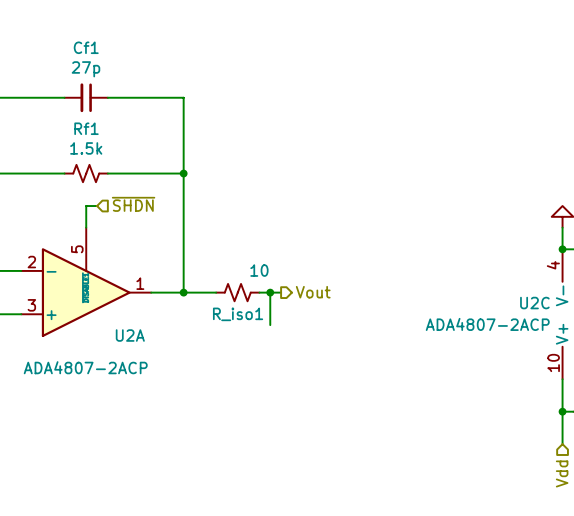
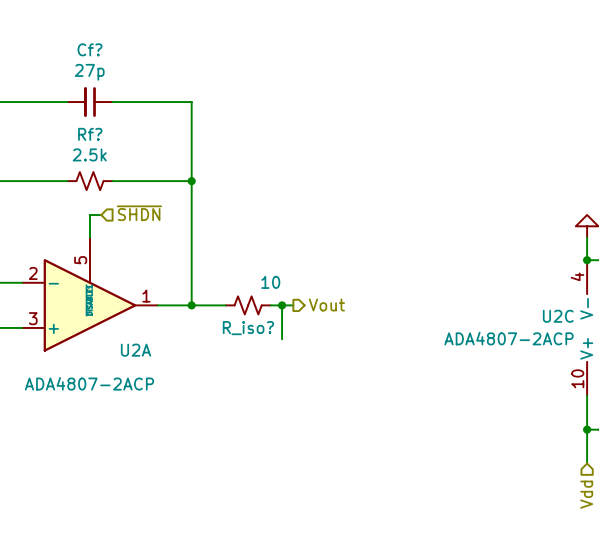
Cf1 name: Cf1 (86, 47) -> Cf? (89, 49)
Rf1 name: Rf1 (86, 128) -> Rf? (90, 134)
Rf1 value: 1.5k (86, 148) -> 2.5k (89, 154)
R_iso1 name: R_iso1 (238, 314) -> R_iso? (248, 328)

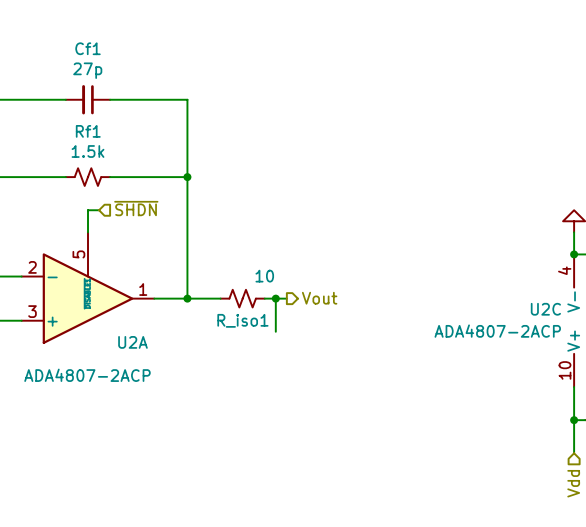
Cf? name: Cf? (89, 49) -> Cf1 (88, 48)
Rf? name: Rf? (90, 134) -> Rf1 (88, 131)
Rf? value: 2.5k (89, 154) -> 1.5k (88, 151)
R_iso? name: R_iso? (248, 328) -> R_iso1 (242, 320)

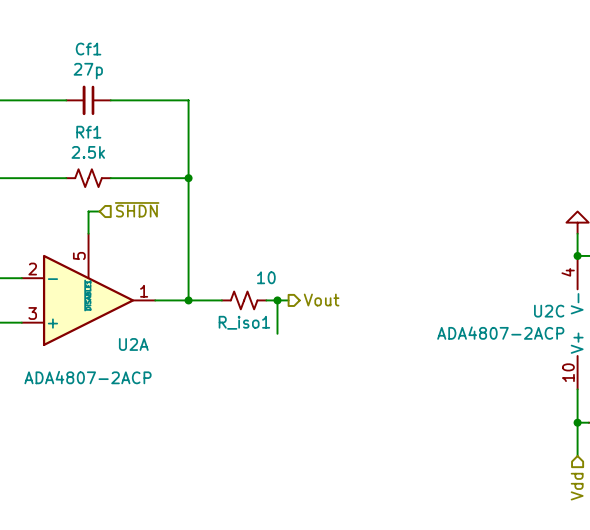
Rf1 value: 1.5k (88, 151) -> 2.5k (88, 152)

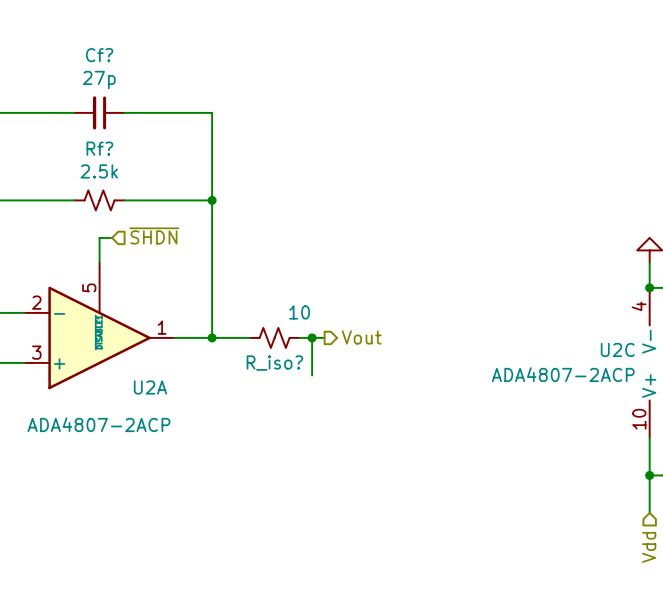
Cf1 name: Cf1 (88, 49) -> Cf? (99, 55)
Rf1 name: Rf1 (88, 132) -> Rf? (99, 148)
R_iso1 name: R_iso1 (244, 322) -> R_iso? (274, 363)

